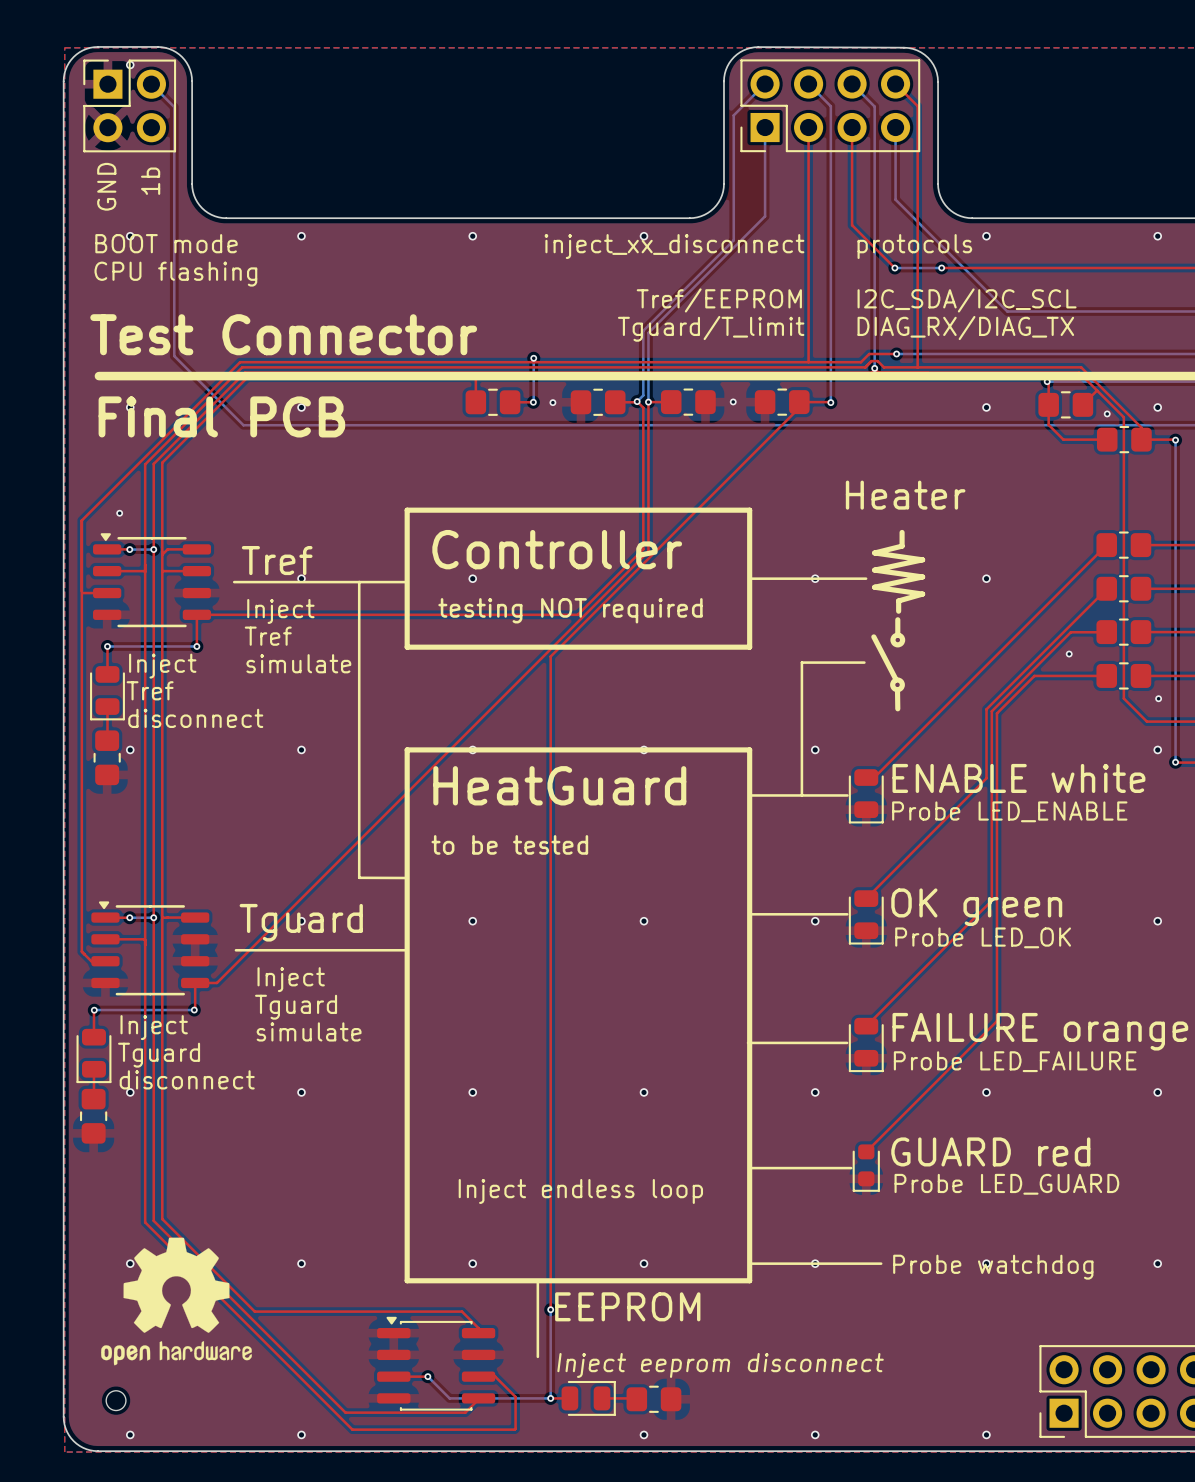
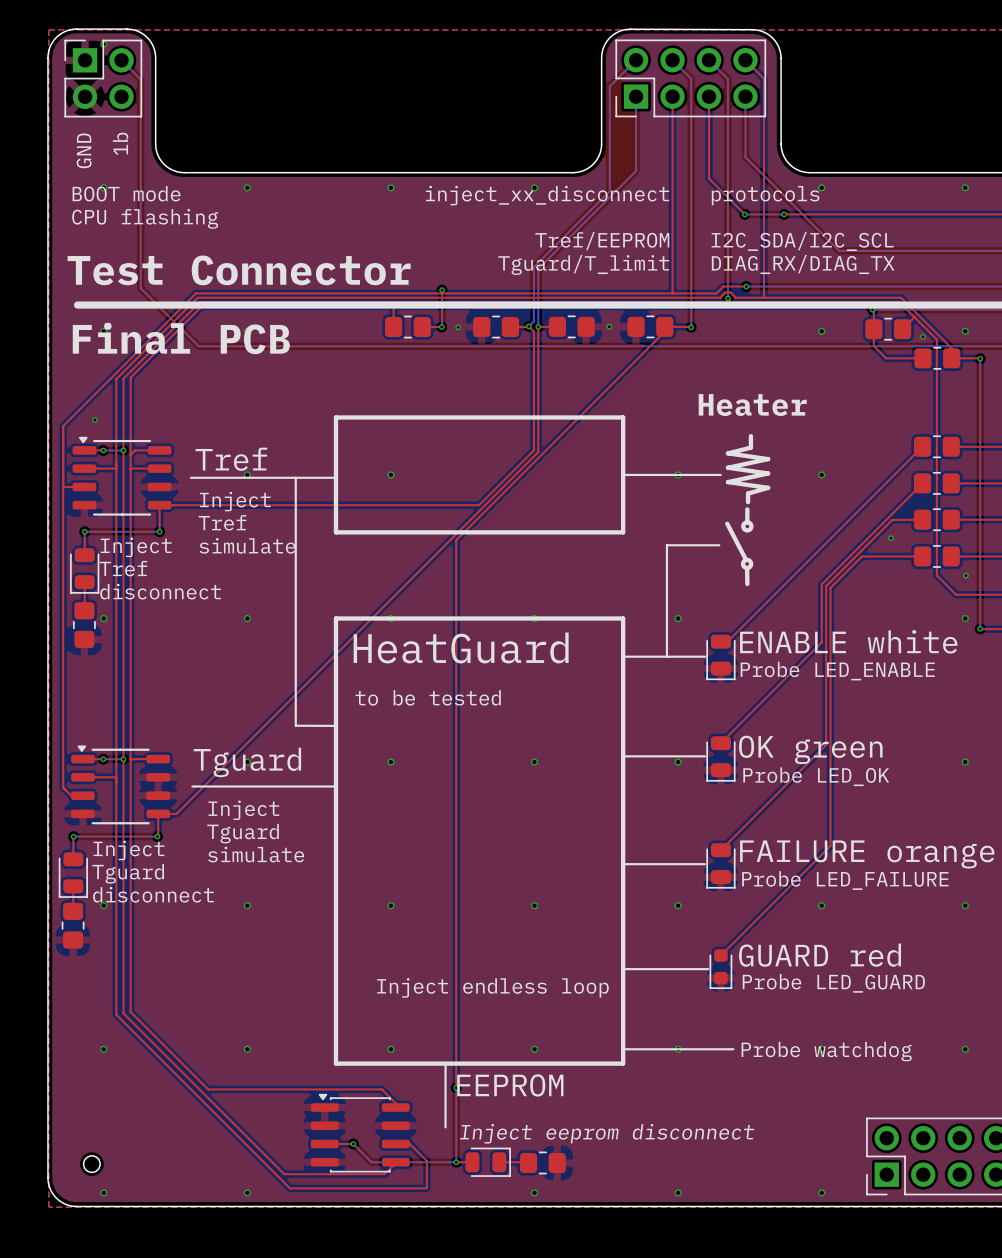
text: Controller (557, 549) -> none
text: testing NOT required (570, 610) -> none
drawing: [101, 1237, 252, 1366] -> none

